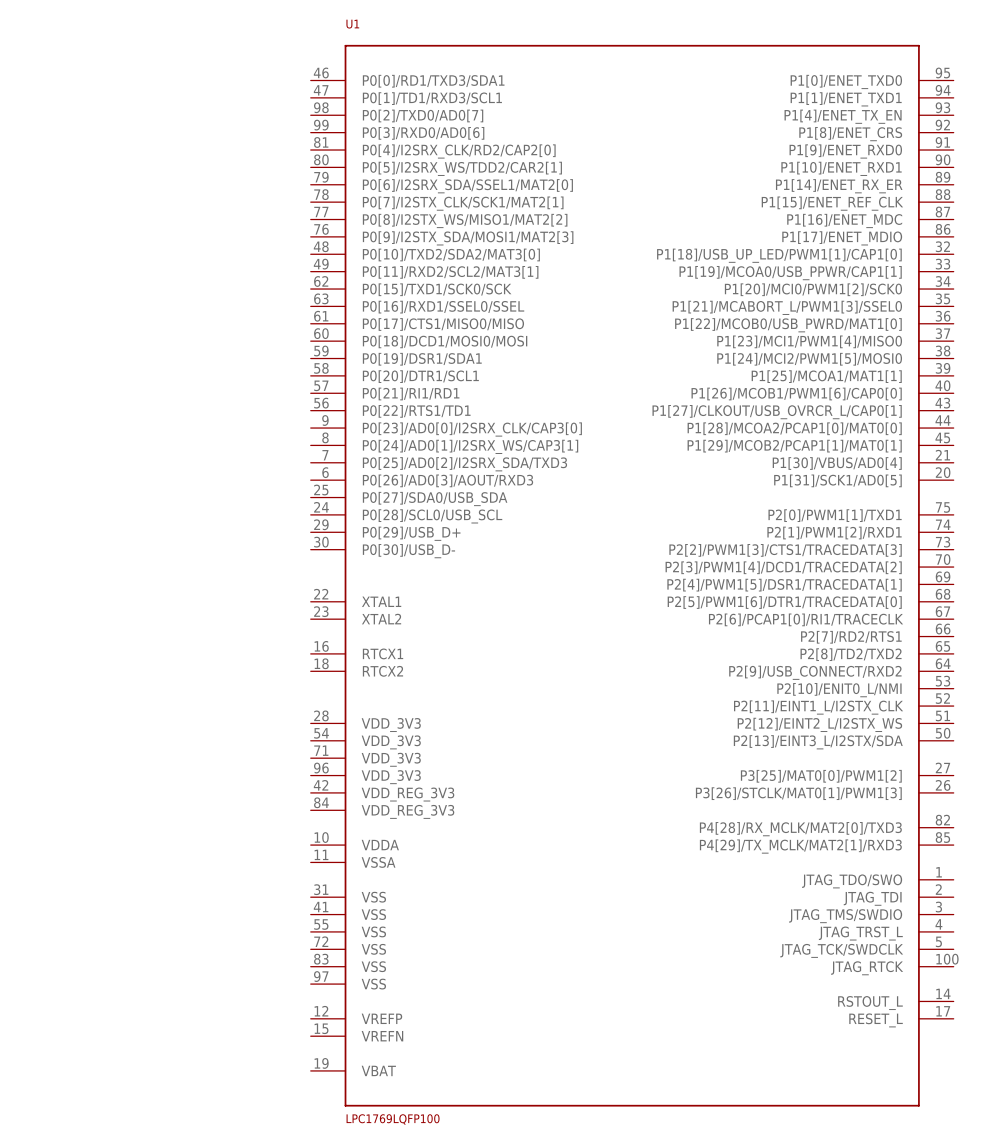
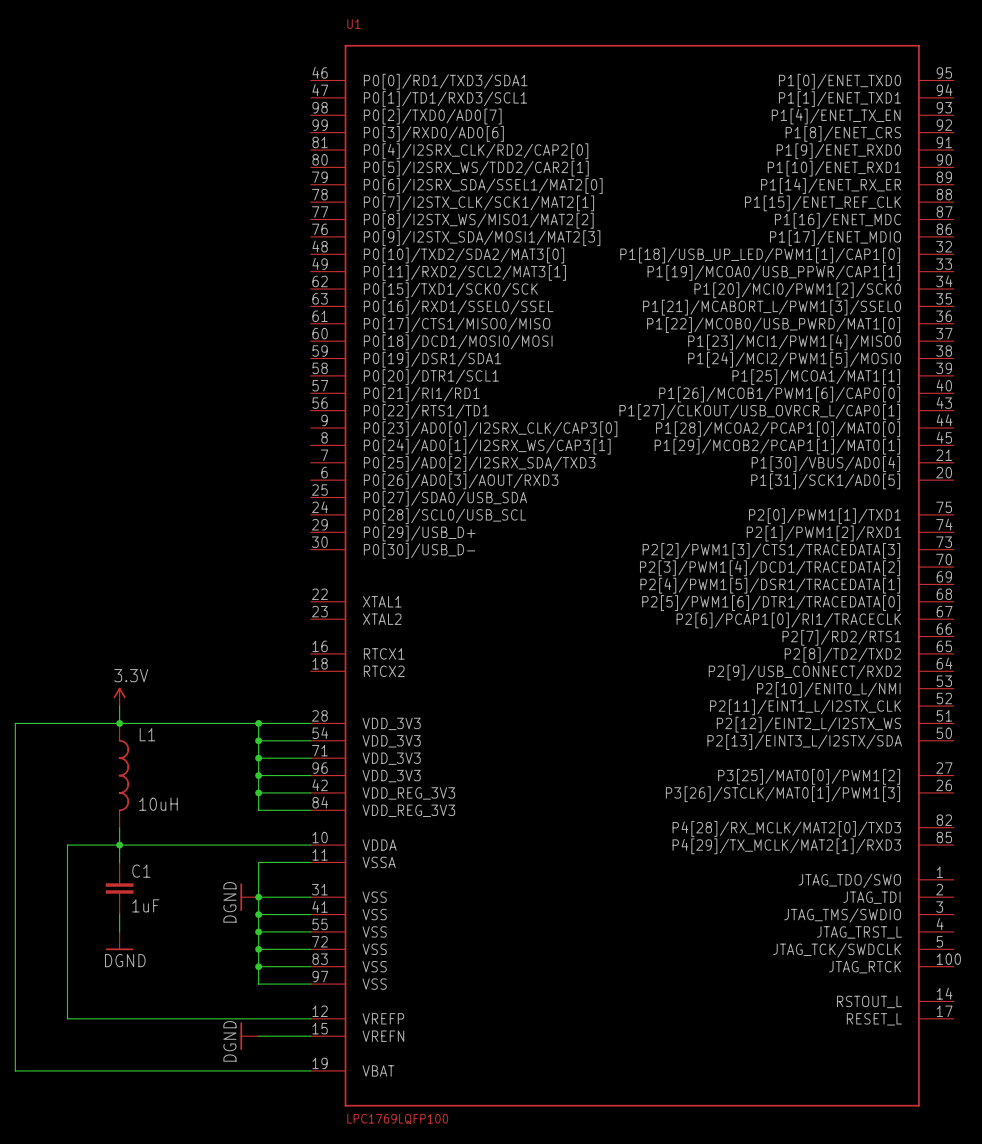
power symbol: none -> 3.3V (119, 696)
wire: none -> (119, 706) (119, 723)
junction: none -> (119, 723)
wire: none -> (258, 723) (258, 810) (310, 810)
junction: none -> (258, 723)
wire: none -> (310, 723) (15, 723) (15, 1070) (310, 1070)
wire: none -> (258, 740) (310, 740)
junction: none -> (258, 740)
wire: none -> (258, 758) (310, 758)
junction: none -> (258, 758)
L1: none -> 10uH (123, 775)
wire: none -> (258, 775) (310, 775)
junction: none -> (258, 775)
wire: none -> (258, 792) (310, 792)
junction: none -> (258, 792)
wire: none -> (119, 827) (119, 862)
junction: none -> (119, 845)
wire: none -> (310, 845) (67, 845) (67, 1018) (310, 1018)
wire: none -> (310, 862) (258, 862) (258, 984) (310, 984)
C1: none -> 1uF (119, 888)
power symbol: none -> DGND (249, 897)
wire: none -> (258, 897) (310, 897)
junction: none -> (258, 897)
wire: none -> (119, 914) (119, 931)
wire: none -> (258, 914) (310, 914)
junction: none -> (258, 914)
wire: none -> (258, 931) (310, 931)
junction: none -> (258, 931)
power symbol: none -> DGND (119, 941)
wire: none -> (258, 949) (310, 949)
junction: none -> (258, 949)
wire: none -> (258, 966) (310, 966)
junction: none -> (258, 966)
power symbol: none -> DGND (249, 1036)
wire: none -> (258, 1036) (310, 1036)

